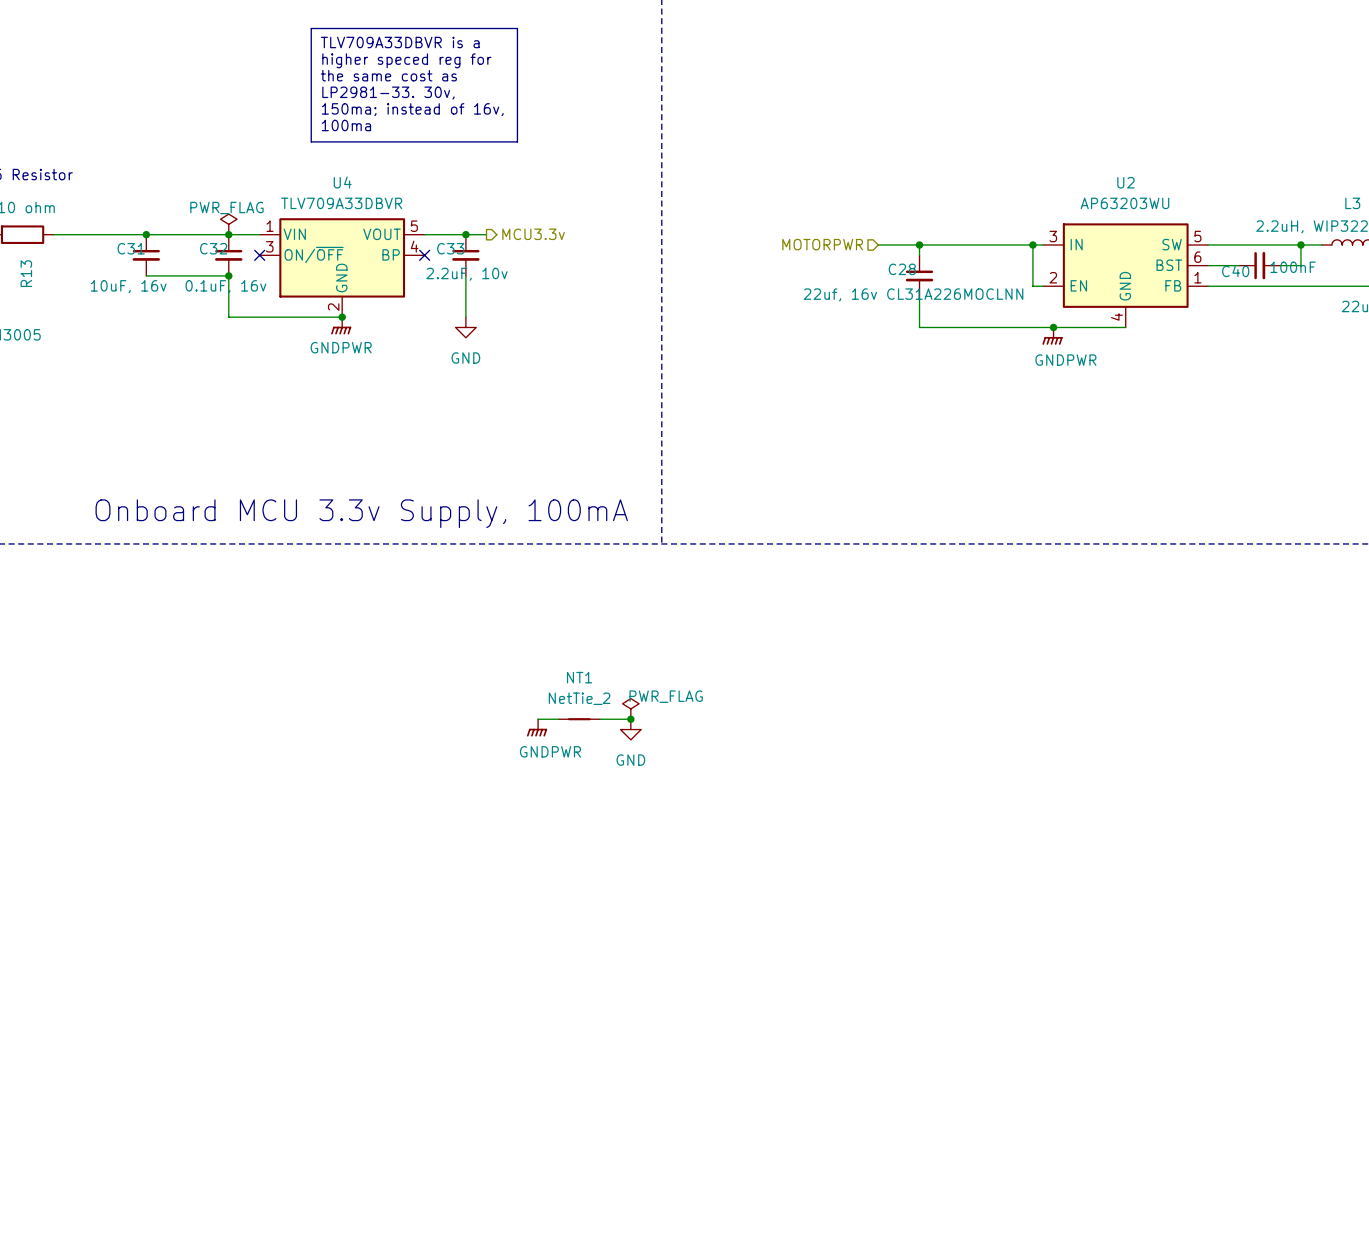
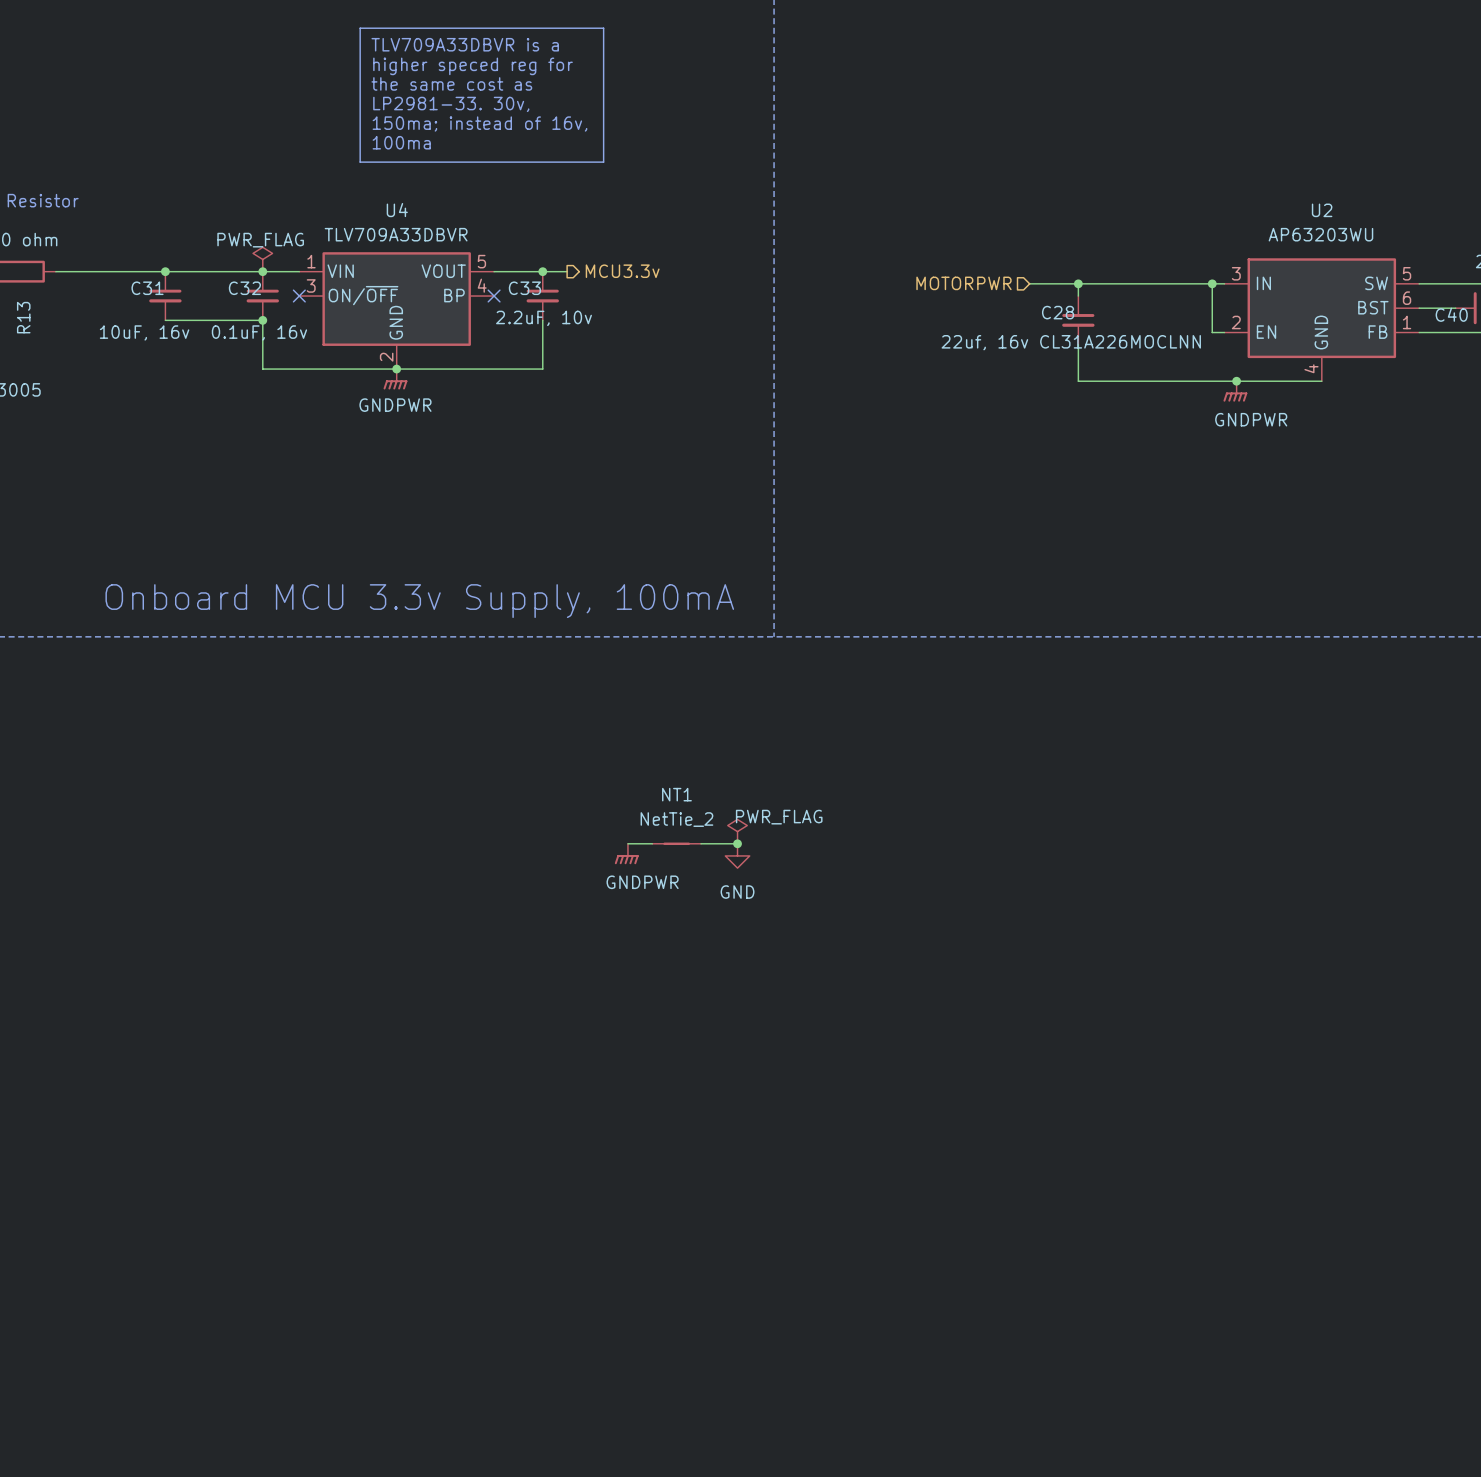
wire: none -> (396, 369) (542, 369)
power symbol: GND (465, 327) -> none

